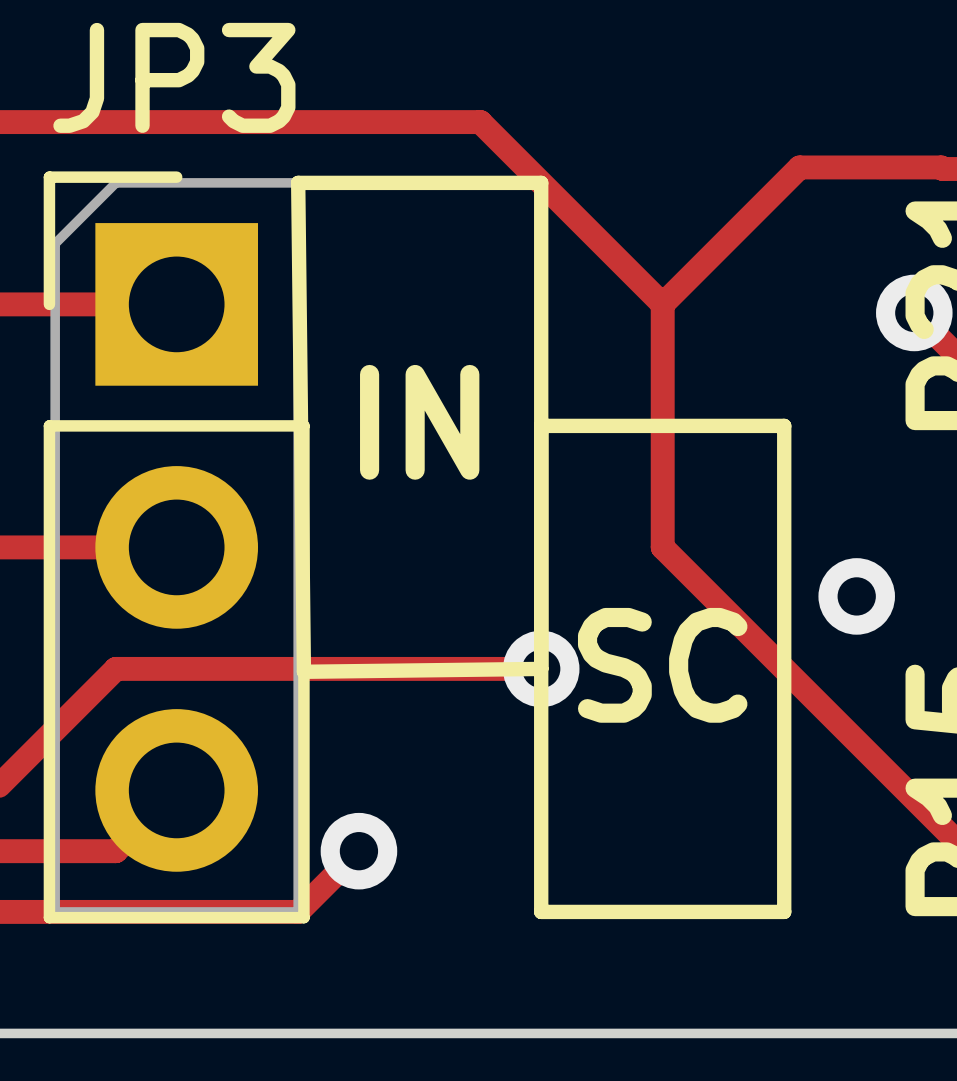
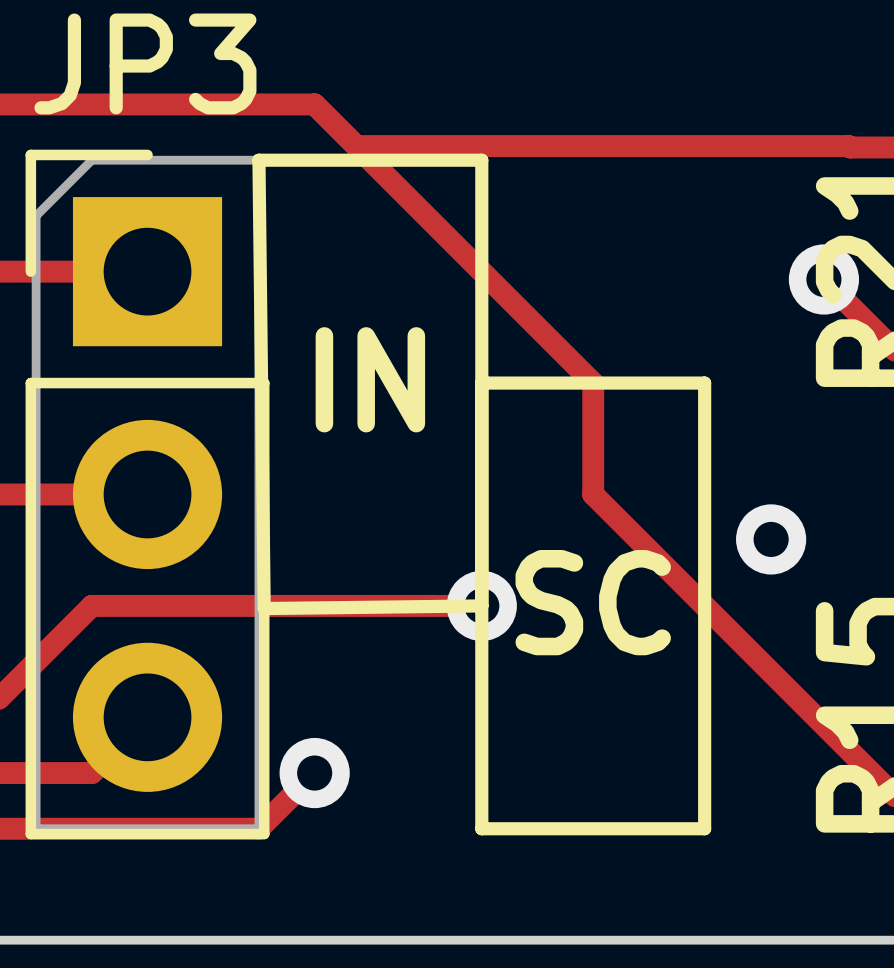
track: (358, 122) (480, 122) (662, 304) -> (314, 104) (593, 383)
track: (799, 167) (662, 304) -> (718, 146) (356, 146)
track: (662, 304) (662, 425) -> none

